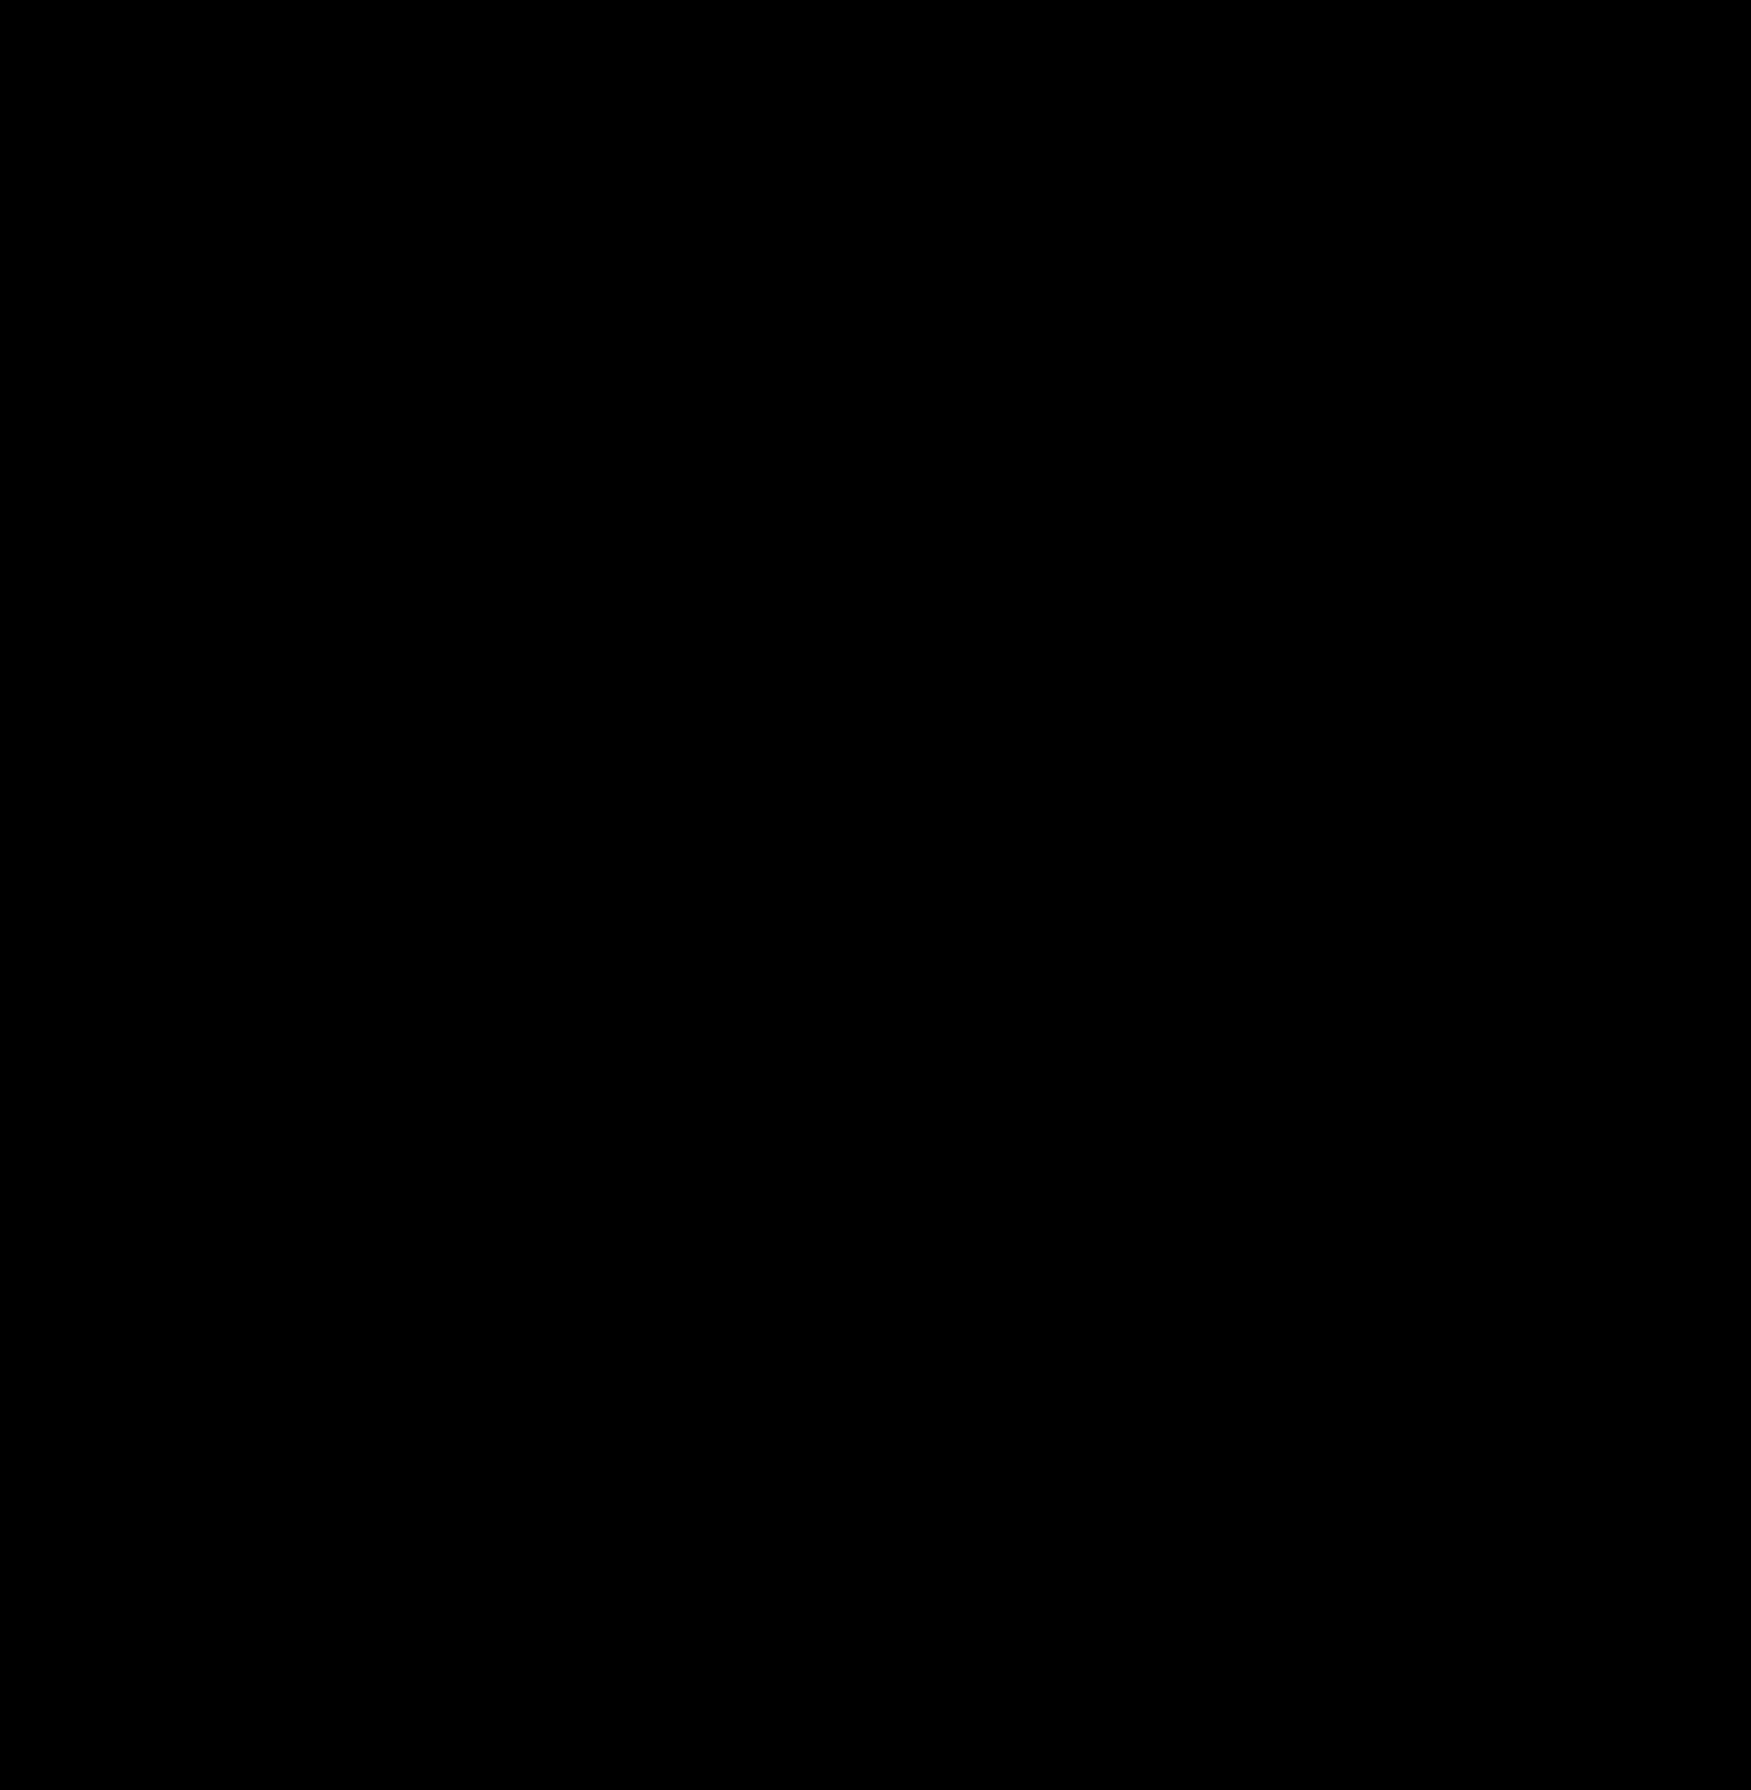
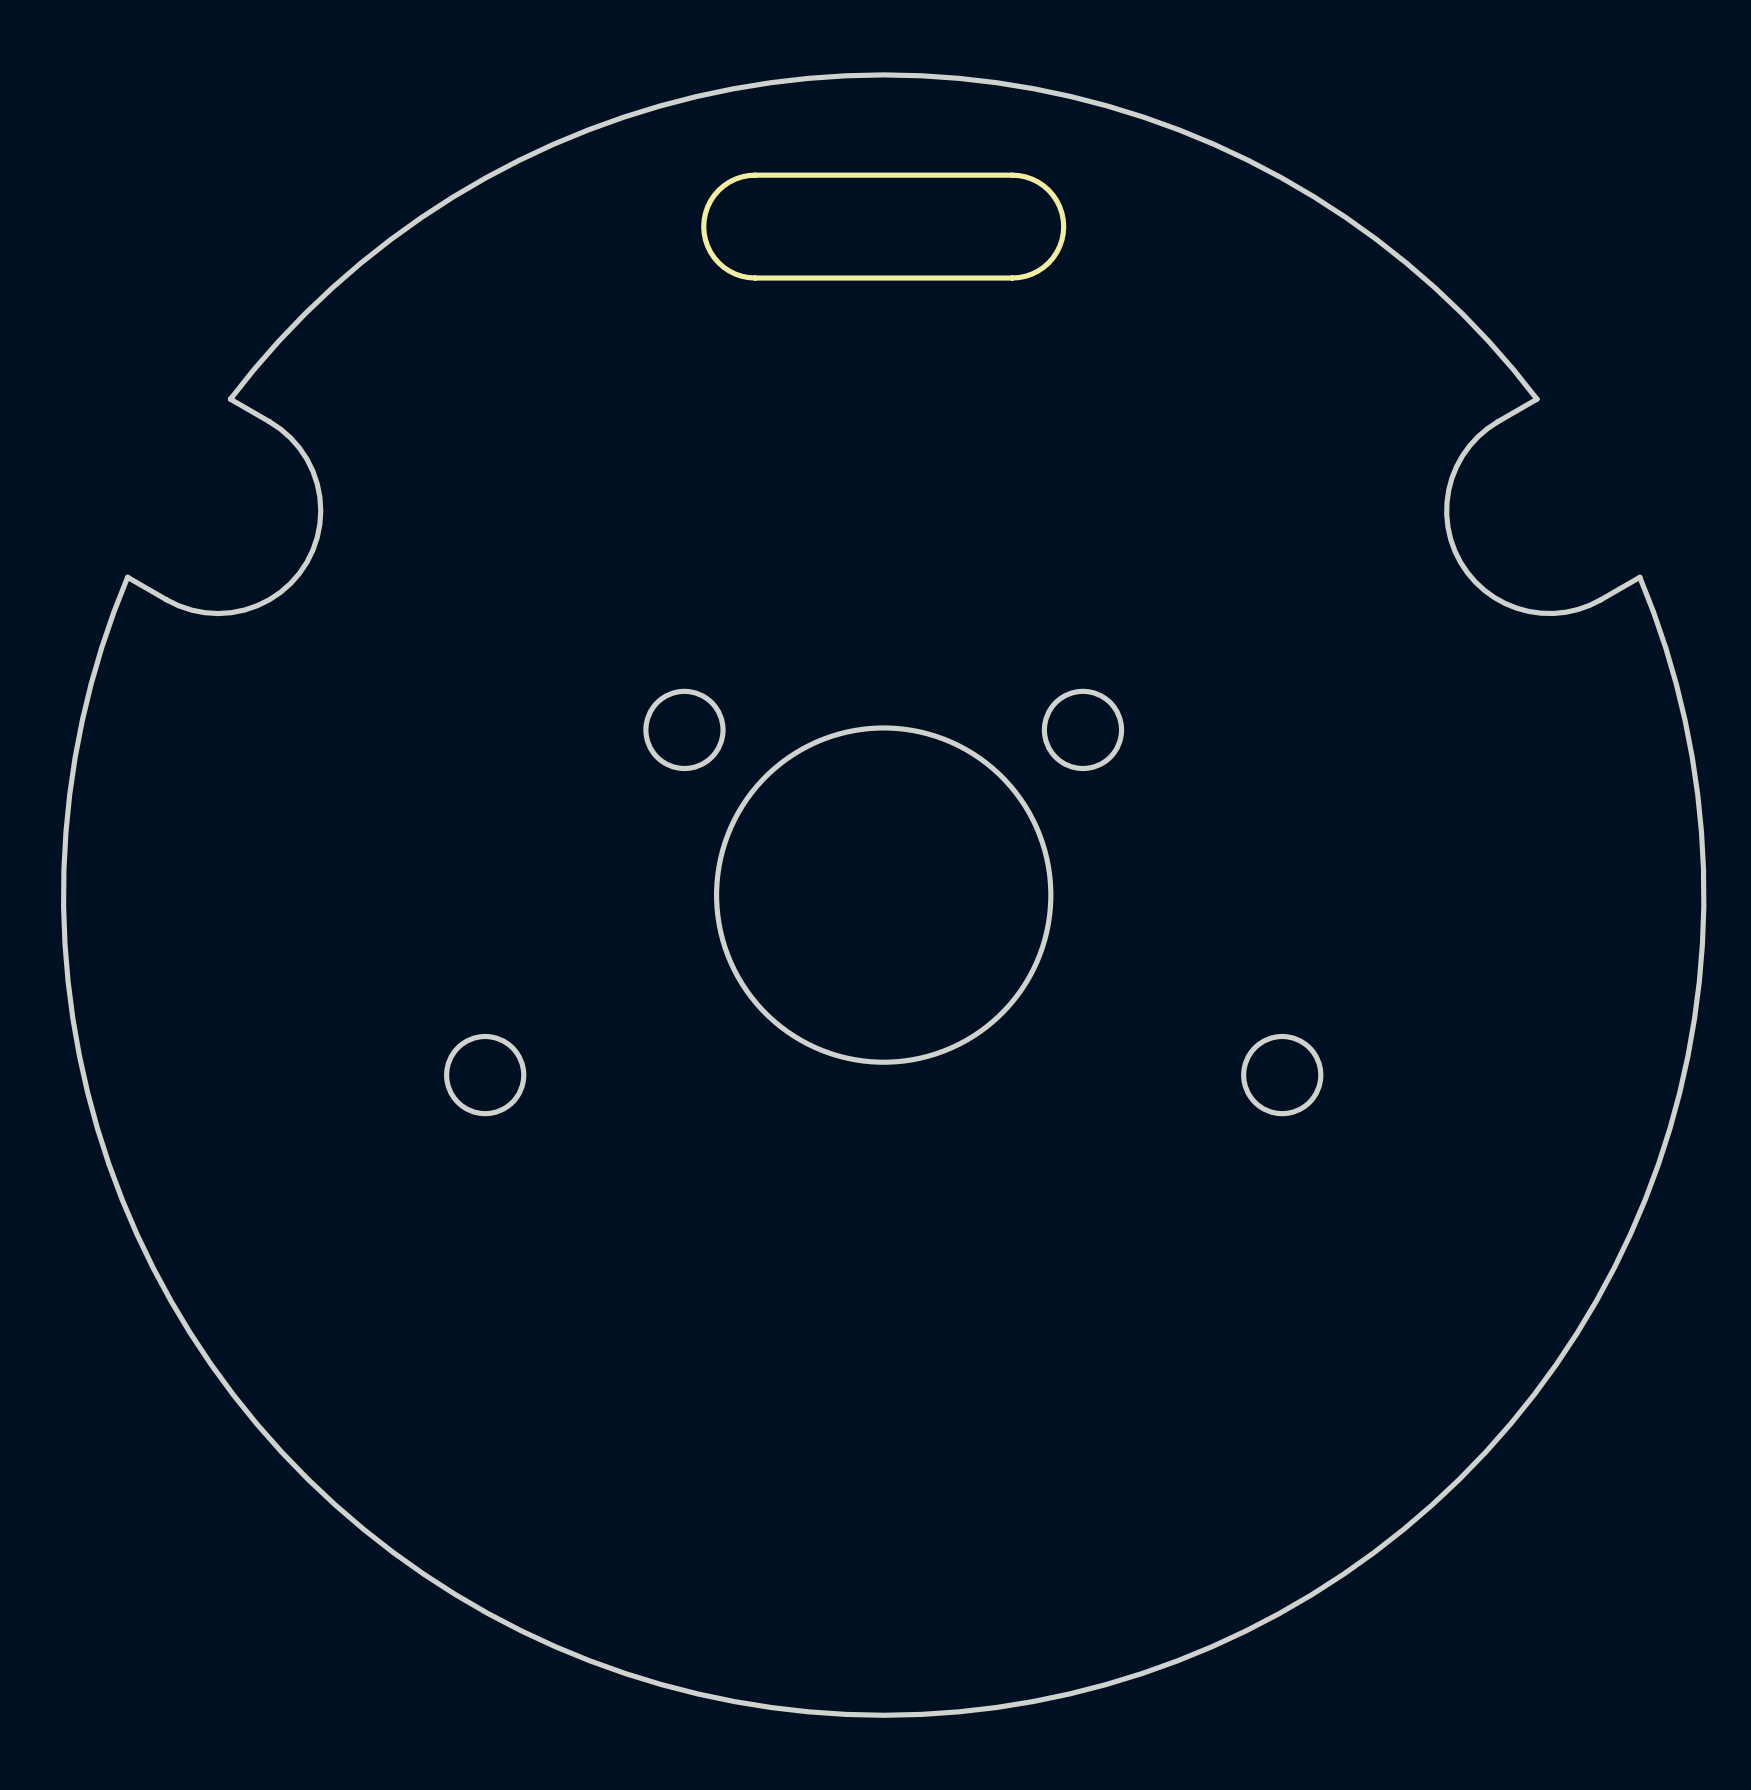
line: none -> (755, 175) (1012, 175) (1025, 176) (1043, 185) (1056, 200) (1063, 219) (1061, 239) (1053, 257) (1043, 267) (1031, 274) (1018, 277) (755, 278) (741, 276) (723, 267) (714, 257) (705, 239) (704, 219) (707, 206) (718, 190) (735, 179) (755, 175)
board edge: none -> (230, 399) (280, 429) (299, 448) (307, 459) (317, 484) (319, 497) (320, 510) (317, 537) (307, 562) (290, 583) (269, 599) (244, 610) (217, 613) (191, 610) (166, 599) (127, 577) (113, 612) (91, 683) (75, 757) (69, 794) (65, 831) (63, 906) (64, 944) (72, 1018) (87, 1092) (109, 1164) (136, 1234) (153, 1268) (190, 1333) (233, 1394) (281, 1452) (335, 1504) (393, 1552) (455, 1594) (521, 1630) (589, 1660) (661, 1684) (734, 1701) (808, 1711) (883, 1715) (958, 1711) (996, 1707) (1069, 1693) (1142, 1673) (1212, 1646) (1279, 1613) (1343, 1574) (1374, 1552) (1432, 1504) (1485, 1452) (1534, 1394) (1577, 1333) (1614, 1268) (1645, 1199) (1669, 1128) (1679, 1092) (1694, 1018) (1702, 944) (1703, 869) (1697, 794) (1685, 720) (1676, 683) (1653, 612) (1639, 577) (1589, 605) (1565, 612) (1541, 613) (1516, 608) (1494, 597) (1475, 581) (1460, 562) (1450, 539) (1446, 514) (1448, 490) (1456, 466) (1469, 445) (1487, 428) (1536, 399) (1513, 369) (1462, 313) (1406, 263) (1376, 239) (1314, 197) (1248, 160) (1214, 144) (1143, 117) (1070, 96) (996, 82) (921, 75) (845, 75) (770, 82) (696, 96) (623, 117) (553, 144) (485, 177) (421, 217) (390, 239) (332, 287) (278, 341) (230, 399)
round board edge: none -> [643, 688, 726, 772]
round board edge: none -> [1041, 688, 1125, 772]
round board edge: none -> [714, 725, 1054, 1065]
round board edge: none -> [444, 1033, 527, 1117]
round board edge: none -> [1241, 1033, 1324, 1117]

